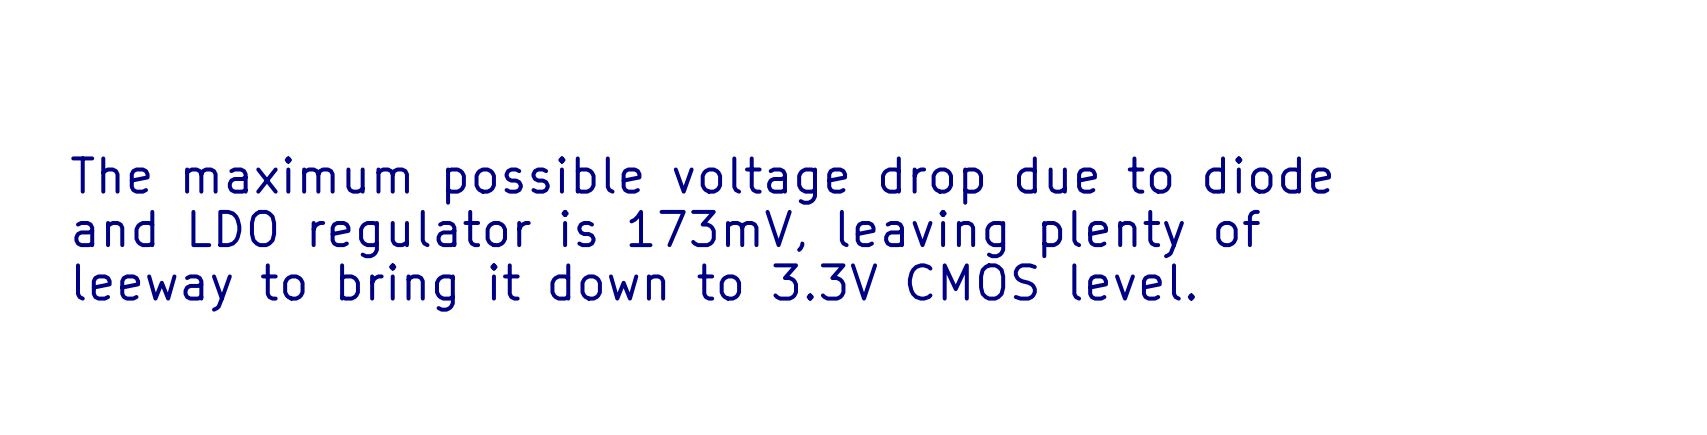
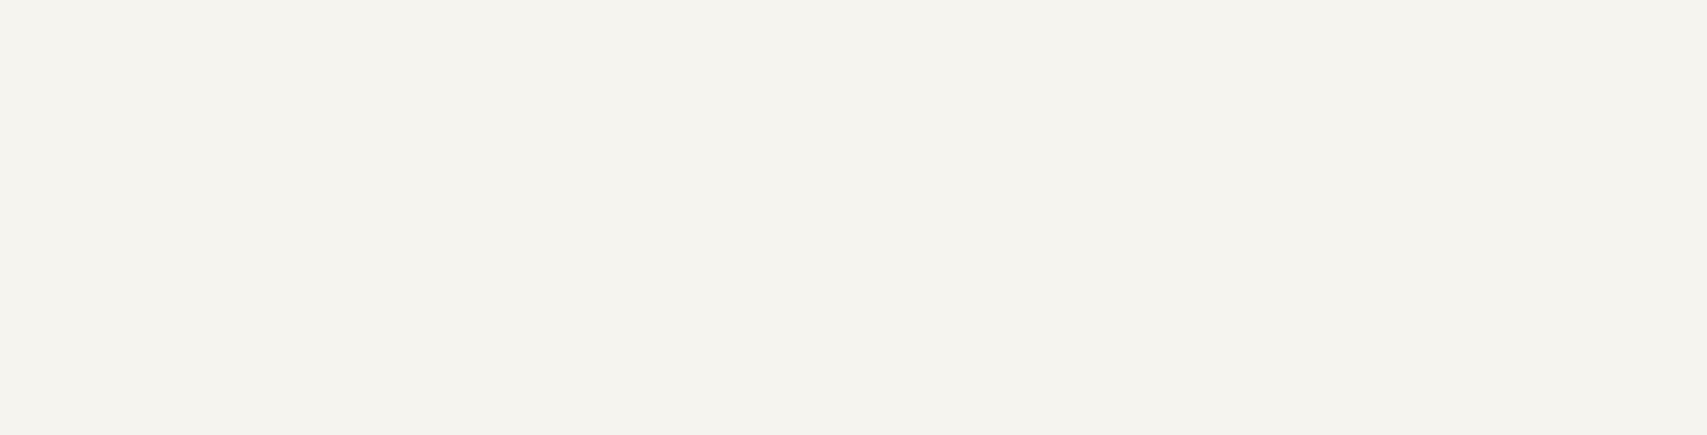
text: The maximum possible voltage drop due to diode (701, 180) -> none
text: and LDO regulator is 173mV, leaving plenty of (667, 234) -> none
text: leeway to bring it down to 3.3V CMOS level. (635, 287) -> none

